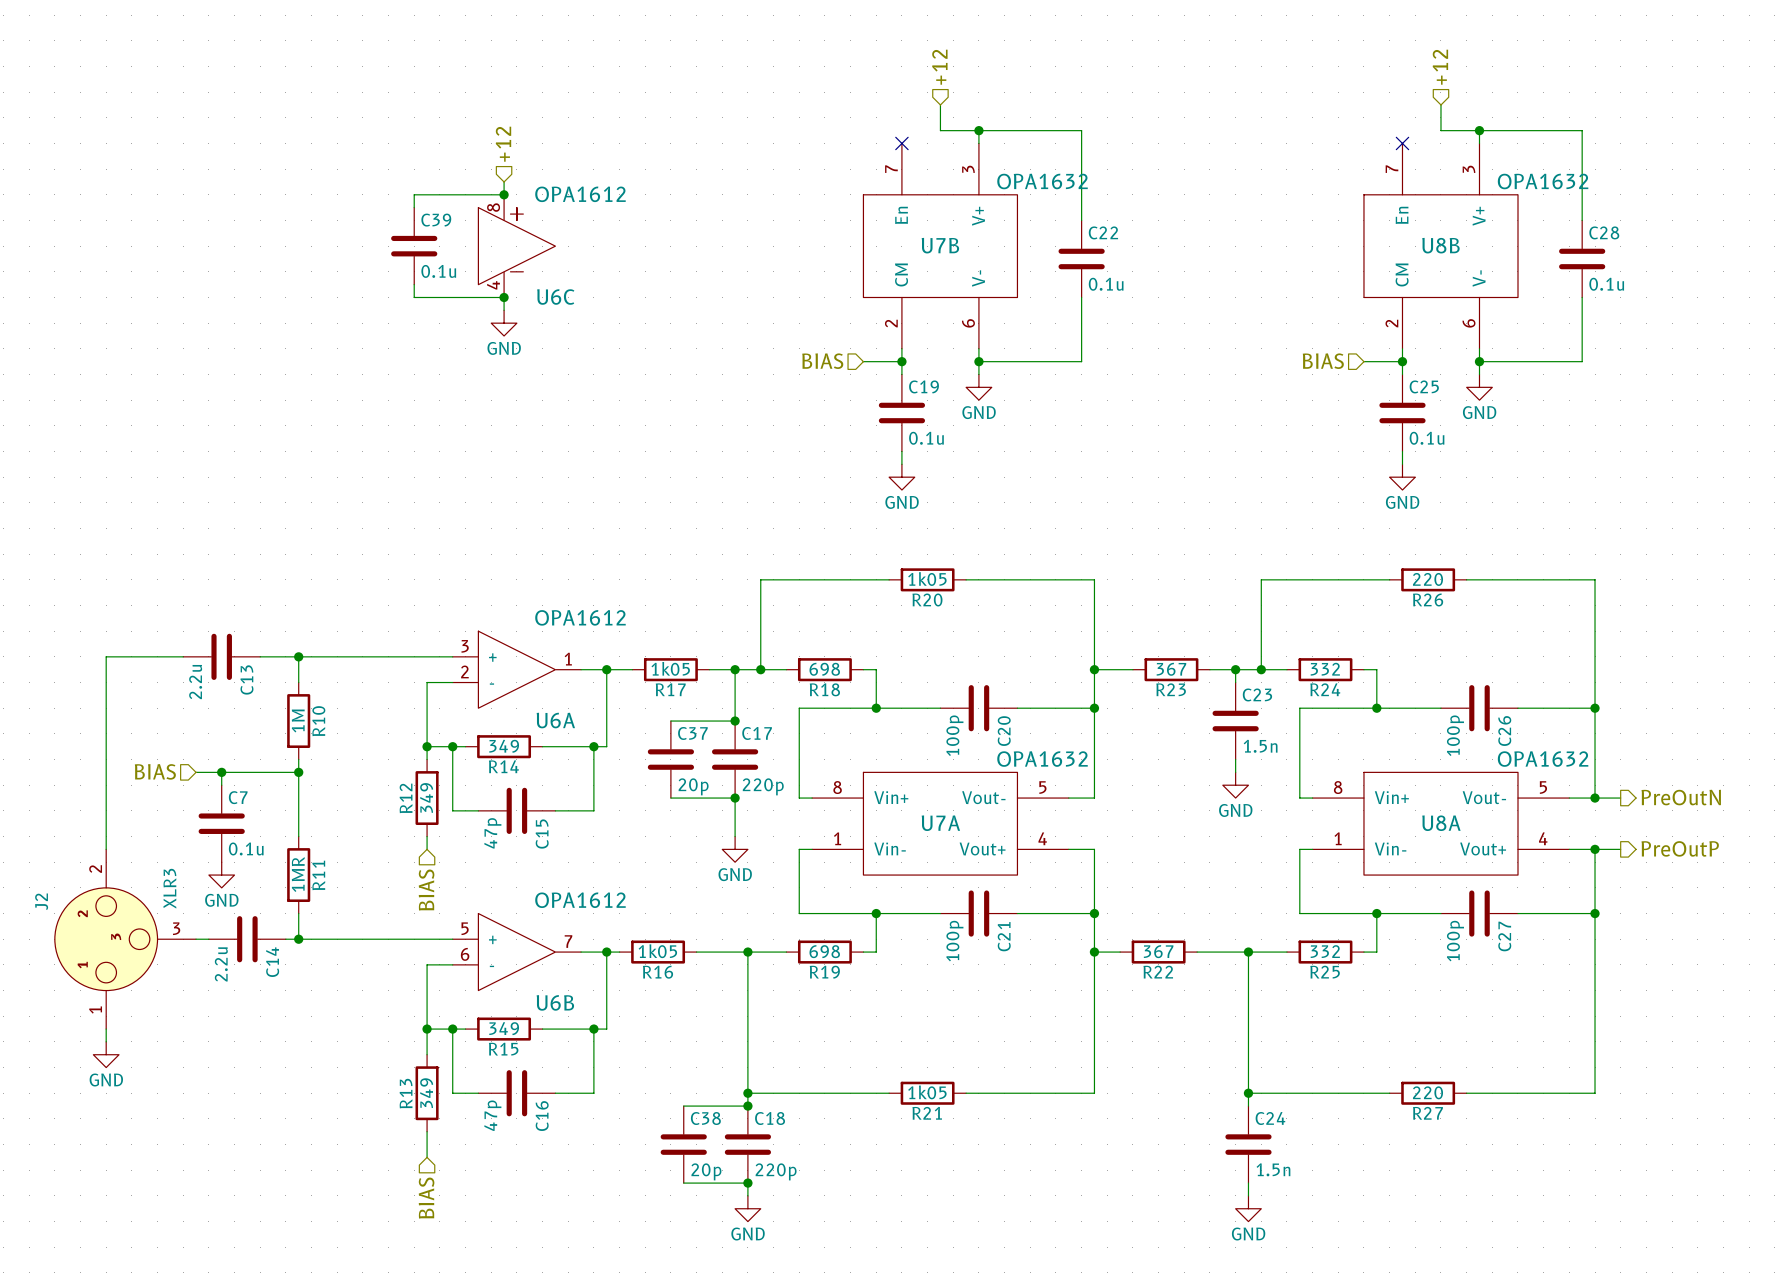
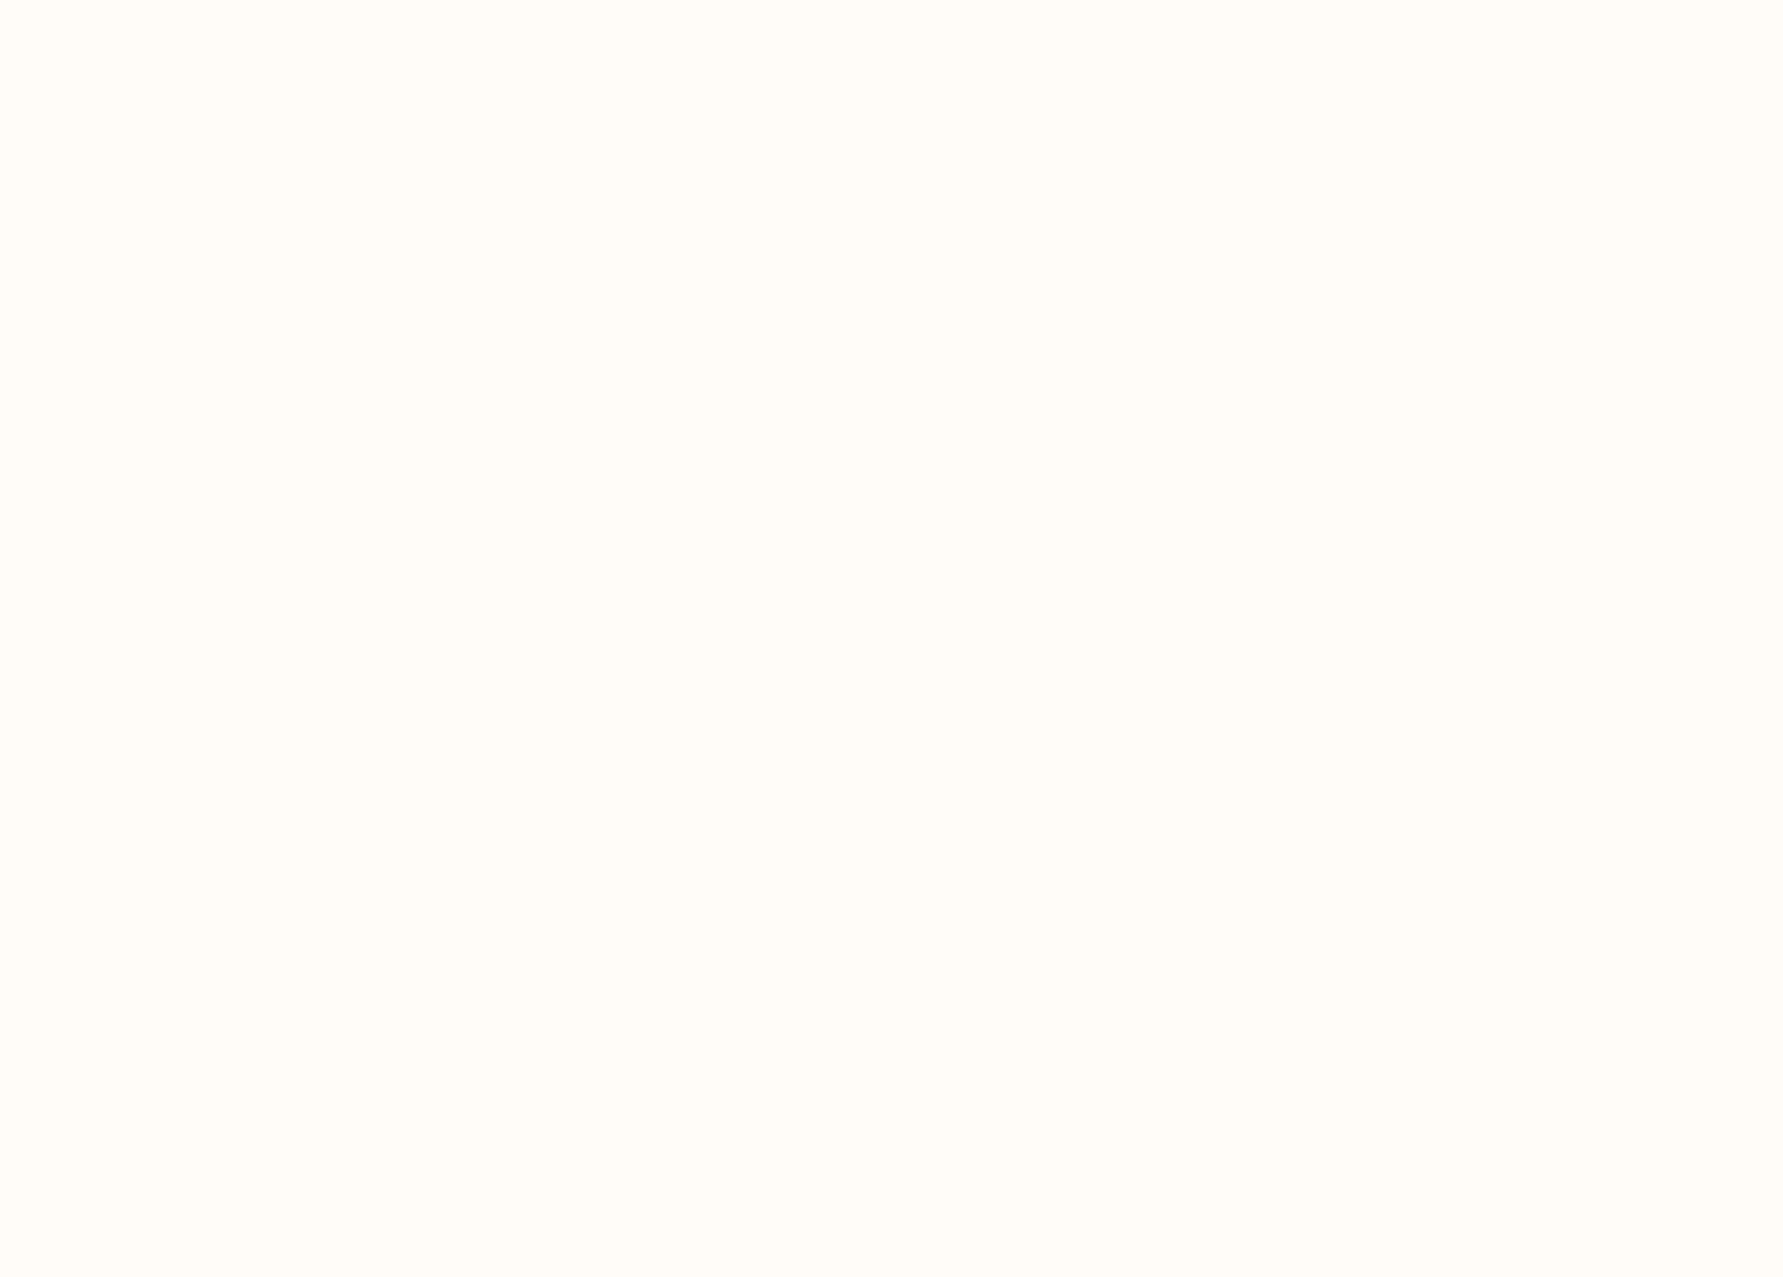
hierarchical label: +12 (939, 67) -> none
hierarchical label: +12 (1440, 67) -> none
wire: (940, 104) (940, 130) (1081, 130) (1081, 220) -> none
wire: (1440, 104) (1440, 130) (1582, 130) (1582, 220) -> none
wire: (978, 130) (978, 143) -> none
junction: (978, 130) -> none
wire: (1479, 130) (1479, 143) -> none
junction: (1479, 130) -> none
no-connect mark: (901, 143) -> none
no-connect mark: (1402, 143) -> none
hierarchical label: +12 (503, 144) -> none
wire: (504, 181) (504, 194) (414, 194) (414, 207) -> none
junction: (504, 194) -> none
C39: 0.1u (414, 246) -> none
U6C: OPA1612 (516, 246) -> none
U7B: OPA1632 (940, 246) -> none
U8B: OPA1632 (1440, 246) -> none
C22: 0.1u (1081, 258) -> none
C28: 0.1u (1582, 258) -> none
wire: (414, 284) (414, 297) (504, 297) (504, 310) -> none
junction: (504, 297) -> none
wire: (1081, 297) (1081, 361) (978, 361) -> none
wire: (1582, 297) (1582, 361) (1479, 361) -> none
power symbol: GND (504, 323) -> none
wire: (901, 348) (901, 374) -> none
wire: (978, 348) (978, 374) -> none
wire: (1402, 348) (1402, 374) -> none
wire: (1479, 348) (1479, 374) -> none
hierarchical label: BIAS (822, 361) -> none
wire: (863, 361) (901, 361) -> none
junction: (901, 361) -> none
junction: (978, 361) -> none
hierarchical label: BIAS (1323, 361) -> none
wire: (1363, 361) (1402, 361) -> none
junction: (1402, 361) -> none
junction: (1479, 361) -> none
power symbol: GND (978, 387) -> none
power symbol: GND (1479, 387) -> none
C19: 0.1u (901, 413) -> none
C25: 0.1u (1402, 413) -> none
wire: (901, 451) (901, 464) -> none
wire: (1402, 451) (1402, 464) -> none
power symbol: GND (901, 477) -> none
power symbol: GND (1402, 477) -> none
wire: (889, 579) (760, 579) (760, 669) -> none
R20: 1k05 (927, 579) -> none
wire: (966, 579) (1094, 579) (1094, 798) (1068, 798) -> none
wire: (1389, 579) (1261, 579) (1261, 669) -> none
R26: 220 (1428, 579) -> none
wire: (1466, 579) (1595, 579) (1595, 798) -> none
wire: (183, 656) (106, 656) (106, 849) -> none
C13: 2.2u (221, 656) -> none
wire: (260, 656) (452, 656) -> none
wire: (298, 656) (298, 682) -> none
junction: (298, 656) -> none
U6A: OPA1612 (516, 669) -> none
wire: (581, 669) (632, 669) -> none
wire: (606, 669) (606, 746) (542, 746) -> none
junction: (606, 669) -> none
R17: 1k05 (670, 669) -> none
wire: (709, 669) (786, 669) -> none
wire: (735, 669) (735, 721) (670, 721) -> none
junction: (735, 669) -> none
junction: (760, 669) -> none
R18: 698 (824, 669) -> none
wire: (863, 669) (876, 669) (876, 708) -> none
wire: (1094, 669) (1132, 669) -> none
junction: (1094, 669) -> none
R23: 367 (1171, 669) -> none
wire: (1209, 669) (1286, 669) -> none
wire: (1235, 669) (1235, 682) -> none
junction: (1235, 669) -> none
junction: (1261, 669) -> none
R24: 332 (1325, 669) -> none
wire: (1363, 669) (1376, 669) (1376, 708) -> none
wire: (452, 682) (427, 682) (427, 759) -> none
junction: (876, 708) -> none
wire: (940, 708) (799, 708) (799, 798) (812, 798) -> none
C20: 100p (978, 708) -> none
wire: (1017, 708) (1094, 708) -> none
junction: (1094, 708) -> none
junction: (1376, 708) -> none
wire: (1440, 708) (1299, 708) (1299, 798) (1312, 798) -> none
C26: 100p (1479, 708) -> none
wire: (1517, 708) (1595, 708) -> none
junction: (1595, 708) -> none
R10: 1M (298, 721) -> none
junction: (735, 721) -> none
C23: 1.5n (1235, 721) -> none
wire: (427, 746) (465, 746) -> none
junction: (427, 746) -> none
wire: (452, 746) (452, 810) (478, 810) -> none
junction: (452, 746) -> none
R14: 349 (504, 746) -> none
wire: (593, 746) (593, 810) (555, 810) -> none
junction: (593, 746) -> none
wire: (298, 759) (298, 836) -> none
C37: 20p (670, 759) -> none
C17: 220p (735, 759) -> none
wire: (1235, 759) (1235, 772) -> none
hierarchical label: BIAS (155, 771) -> none
wire: (196, 772) (298, 772) -> none
wire: (221, 772) (221, 785) -> none
junction: (221, 772) -> none
junction: (298, 772) -> none
power symbol: GND (1235, 785) -> none
hierarchical label: PreOutN (1681, 797) -> none
R12: 349 (427, 798) -> none
wire: (670, 798) (735, 798) (735, 836) -> none
junction: (735, 798) -> none
wire: (1569, 798) (1620, 798) -> none
junction: (1595, 798) -> none
C15: 47p (516, 810) -> none
C7: 0.1u (221, 823) -> none
U7A: OPA1632 (940, 823) -> none
U8A: OPA1632 (1440, 823) -> none
wire: (427, 836) (427, 849) -> none
hierarchical label: PreOutP (1680, 848) -> none
power symbol: GND (735, 849) -> none
wire: (812, 849) (799, 849) (799, 913) (940, 913) -> none
wire: (1068, 849) (1094, 849) (1094, 1093) (966, 1093) -> none
wire: (1312, 849) (1299, 849) (1299, 913) (1440, 913) -> none
wire: (1569, 849) (1620, 849) -> none
wire: (1595, 849) (1595, 1093) (1466, 1093) -> none
junction: (1595, 849) -> none
power symbol: GND (221, 875) -> none
R11: 1MR (298, 875) -> none
hierarchical label: BIAS (426, 890) -> none
wire: (298, 913) (298, 939) -> none
wire: (876, 913) (876, 952) (863, 952) -> none
junction: (876, 913) -> none
C21: 100p (978, 913) -> none
wire: (1017, 913) (1094, 913) -> none
junction: (1094, 913) -> none
wire: (1376, 913) (1376, 952) (1363, 952) -> none
junction: (1376, 913) -> none
C27: 100p (1479, 913) -> none
wire: (1517, 913) (1595, 913) -> none
junction: (1595, 913) -> none
J2: XLR3 (125, 939) -> none
wire: (196, 939) (208, 939) -> none
C14: 2.2u (247, 939) -> none
wire: (285, 939) (452, 939) -> none
junction: (298, 939) -> none
U6B: OPA1612 (516, 952) -> none
wire: (581, 952) (619, 952) -> none
wire: (606, 952) (606, 1029) (542, 1029) -> none
junction: (606, 952) -> none
R16: 1k05 (658, 952) -> none
wire: (696, 952) (786, 952) -> none
wire: (747, 952) (747, 1106) (683, 1106) -> none
junction: (747, 952) -> none
R19: 698 (824, 952) -> none
wire: (1094, 952) (1120, 952) -> none
junction: (1094, 952) -> none
R22: 367 (1158, 952) -> none
wire: (1197, 952) (1286, 952) -> none
wire: (1248, 952) (1248, 1106) -> none
junction: (1248, 952) -> none
R25: 332 (1325, 952) -> none
wire: (452, 964) (427, 964) (427, 1054) -> none
wire: (106, 1029) (106, 1041) -> none
wire: (427, 1029) (465, 1029) -> none
junction: (427, 1029) -> none
wire: (452, 1029) (452, 1093) (478, 1093) -> none
junction: (452, 1029) -> none
R15: 349 (504, 1029) -> none
wire: (593, 1029) (593, 1093) (555, 1093) -> none
junction: (593, 1029) -> none
power symbol: GND (106, 1054) -> none
R13: 349 (427, 1093) -> none
C16: 47p (516, 1093) -> none
wire: (747, 1093) (889, 1093) -> none
junction: (747, 1093) -> none
R21: 1k05 (927, 1093) -> none
wire: (1248, 1093) (1389, 1093) -> none
junction: (1248, 1093) -> none
R27: 220 (1428, 1093) -> none
junction: (747, 1106) -> none
wire: (427, 1131) (427, 1157) -> none
C38: 20p (683, 1144) -> none
C18: 220p (747, 1144) -> none
C24: 1.5n (1248, 1144) -> none
wire: (683, 1183) (747, 1183) (747, 1195) -> none
junction: (747, 1183) -> none
wire: (1248, 1183) (1248, 1195) -> none
hierarchical label: BIAS (426, 1198) -> none
power symbol: GND (747, 1208) -> none
power symbol: GND (1248, 1208) -> none

